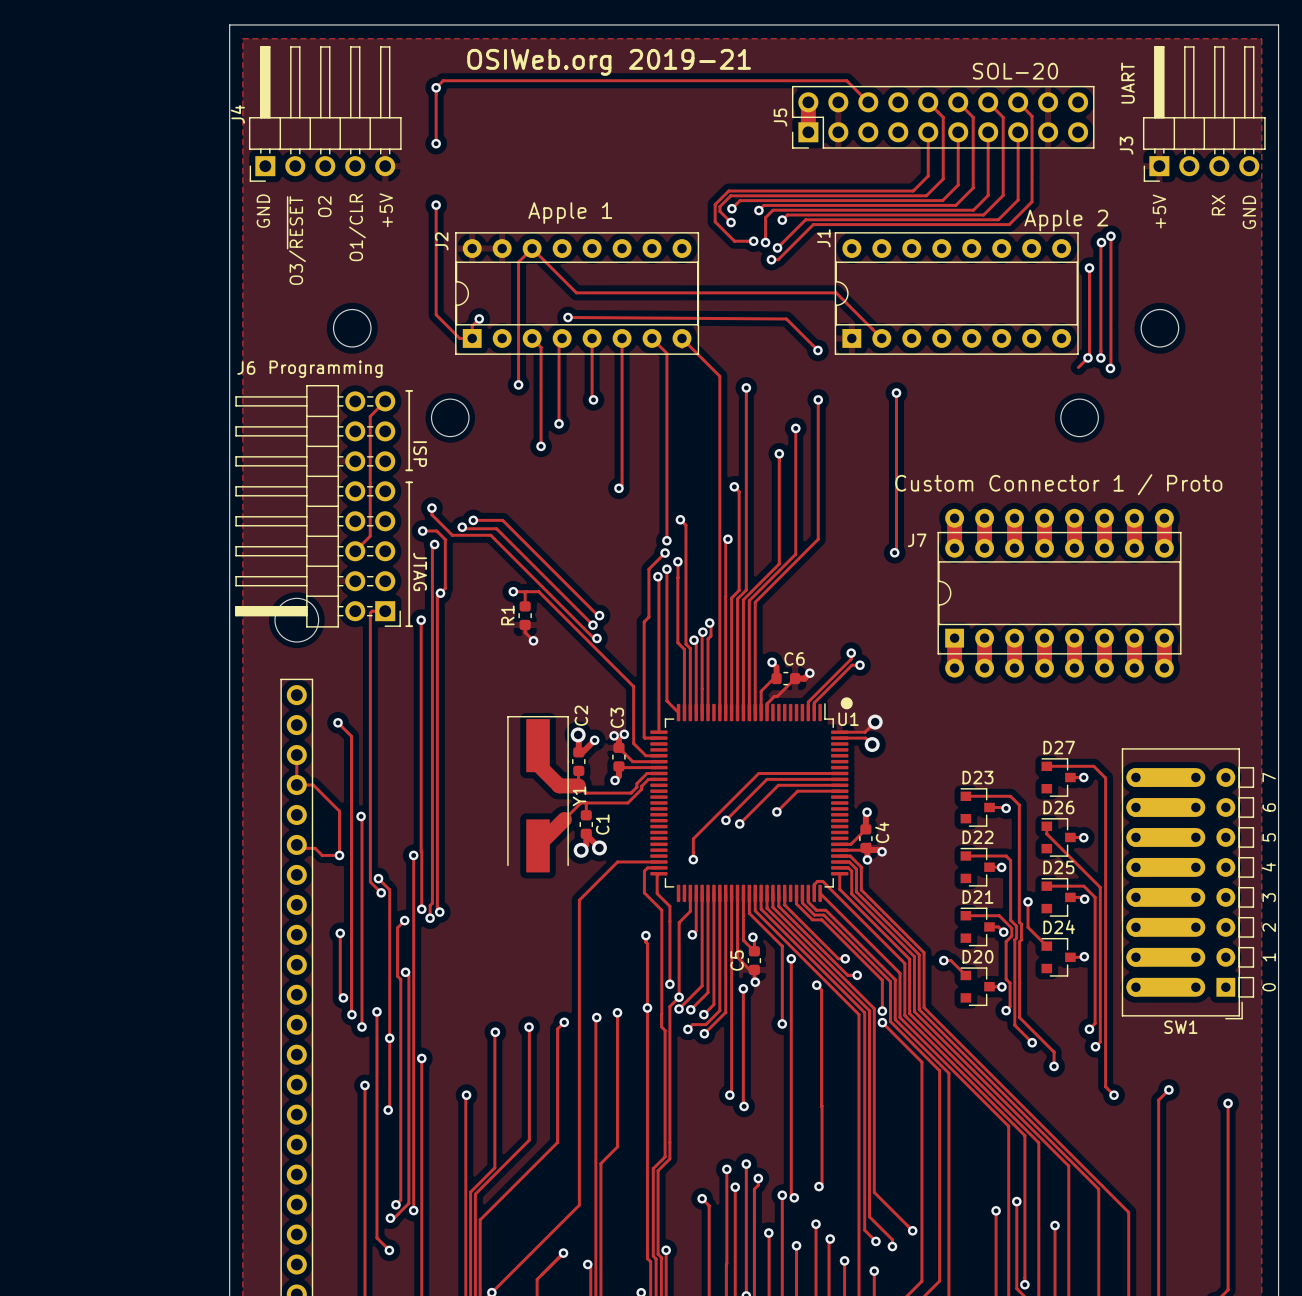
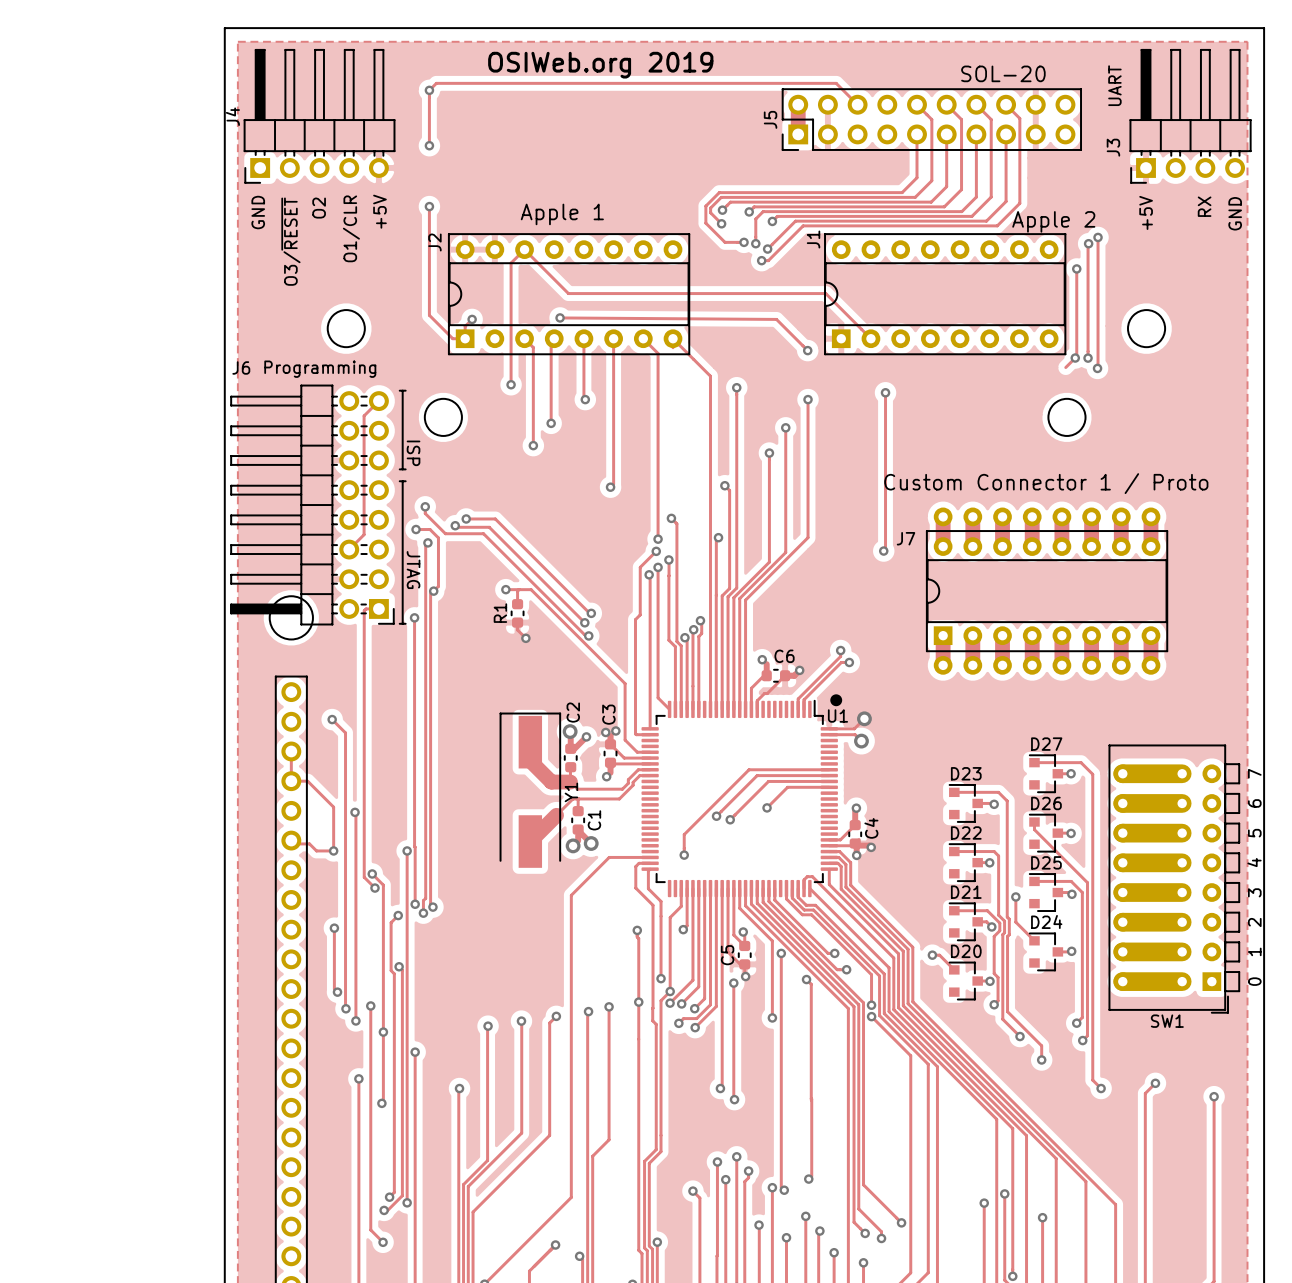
text: OSIWeb.org 2019-21 (609, 62) -> OSIWeb.org 2019 (600, 65)

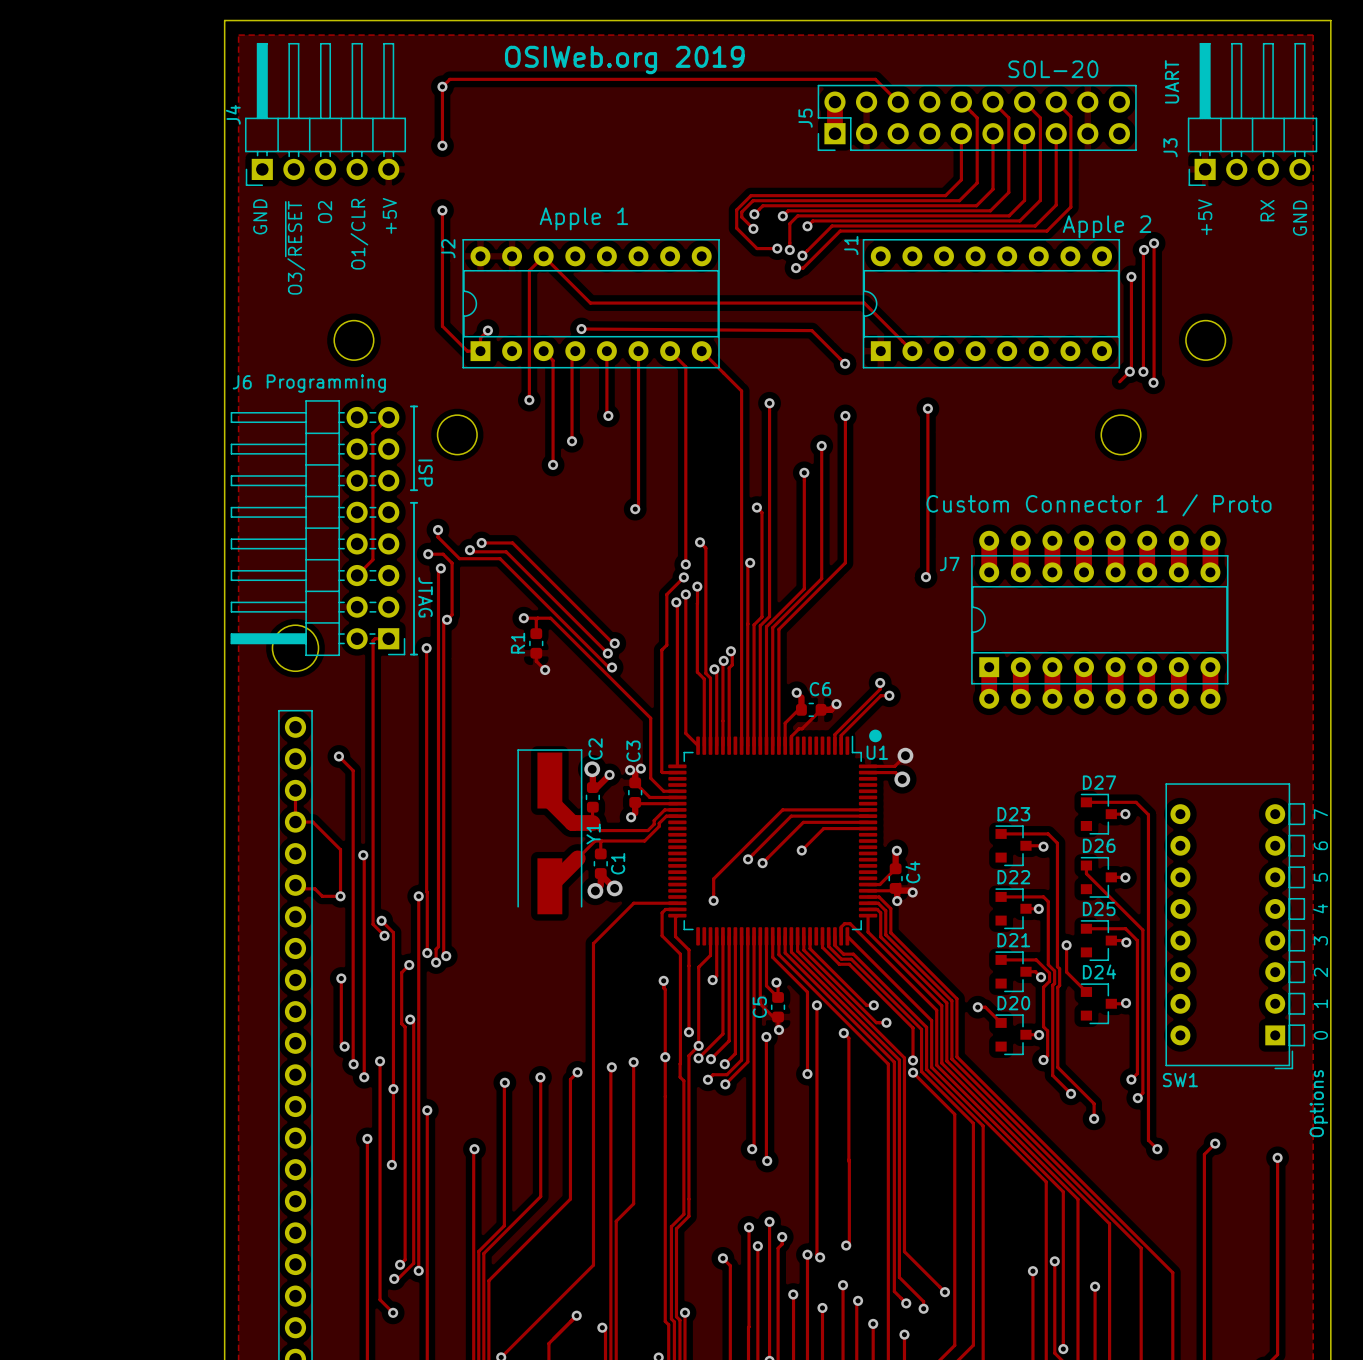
SW1 footprint: [1108, 744, 1240, 1014] -> [1165, 783, 1306, 1070]
SW1 name position: SW1 (1167, 1021) -> SW1 (1180, 1080)
SW1 value: none -> Options (1318, 1103)

